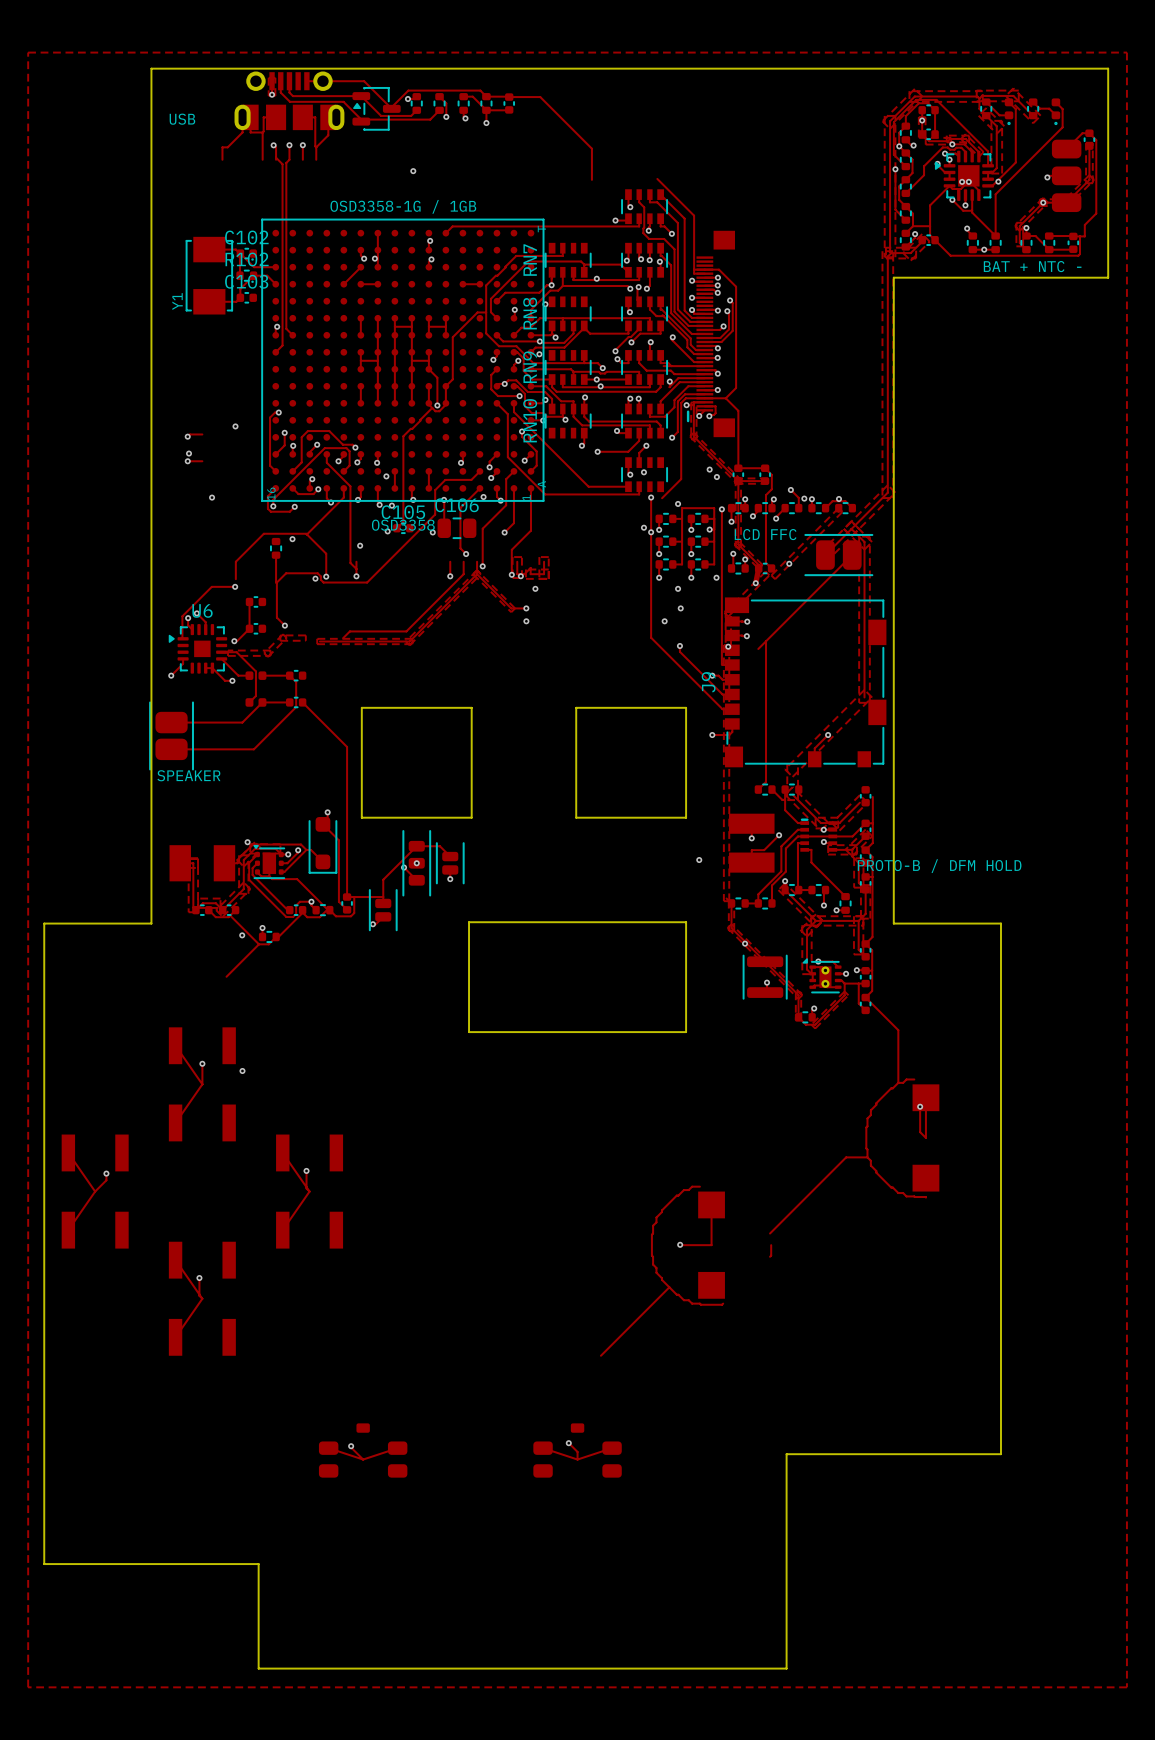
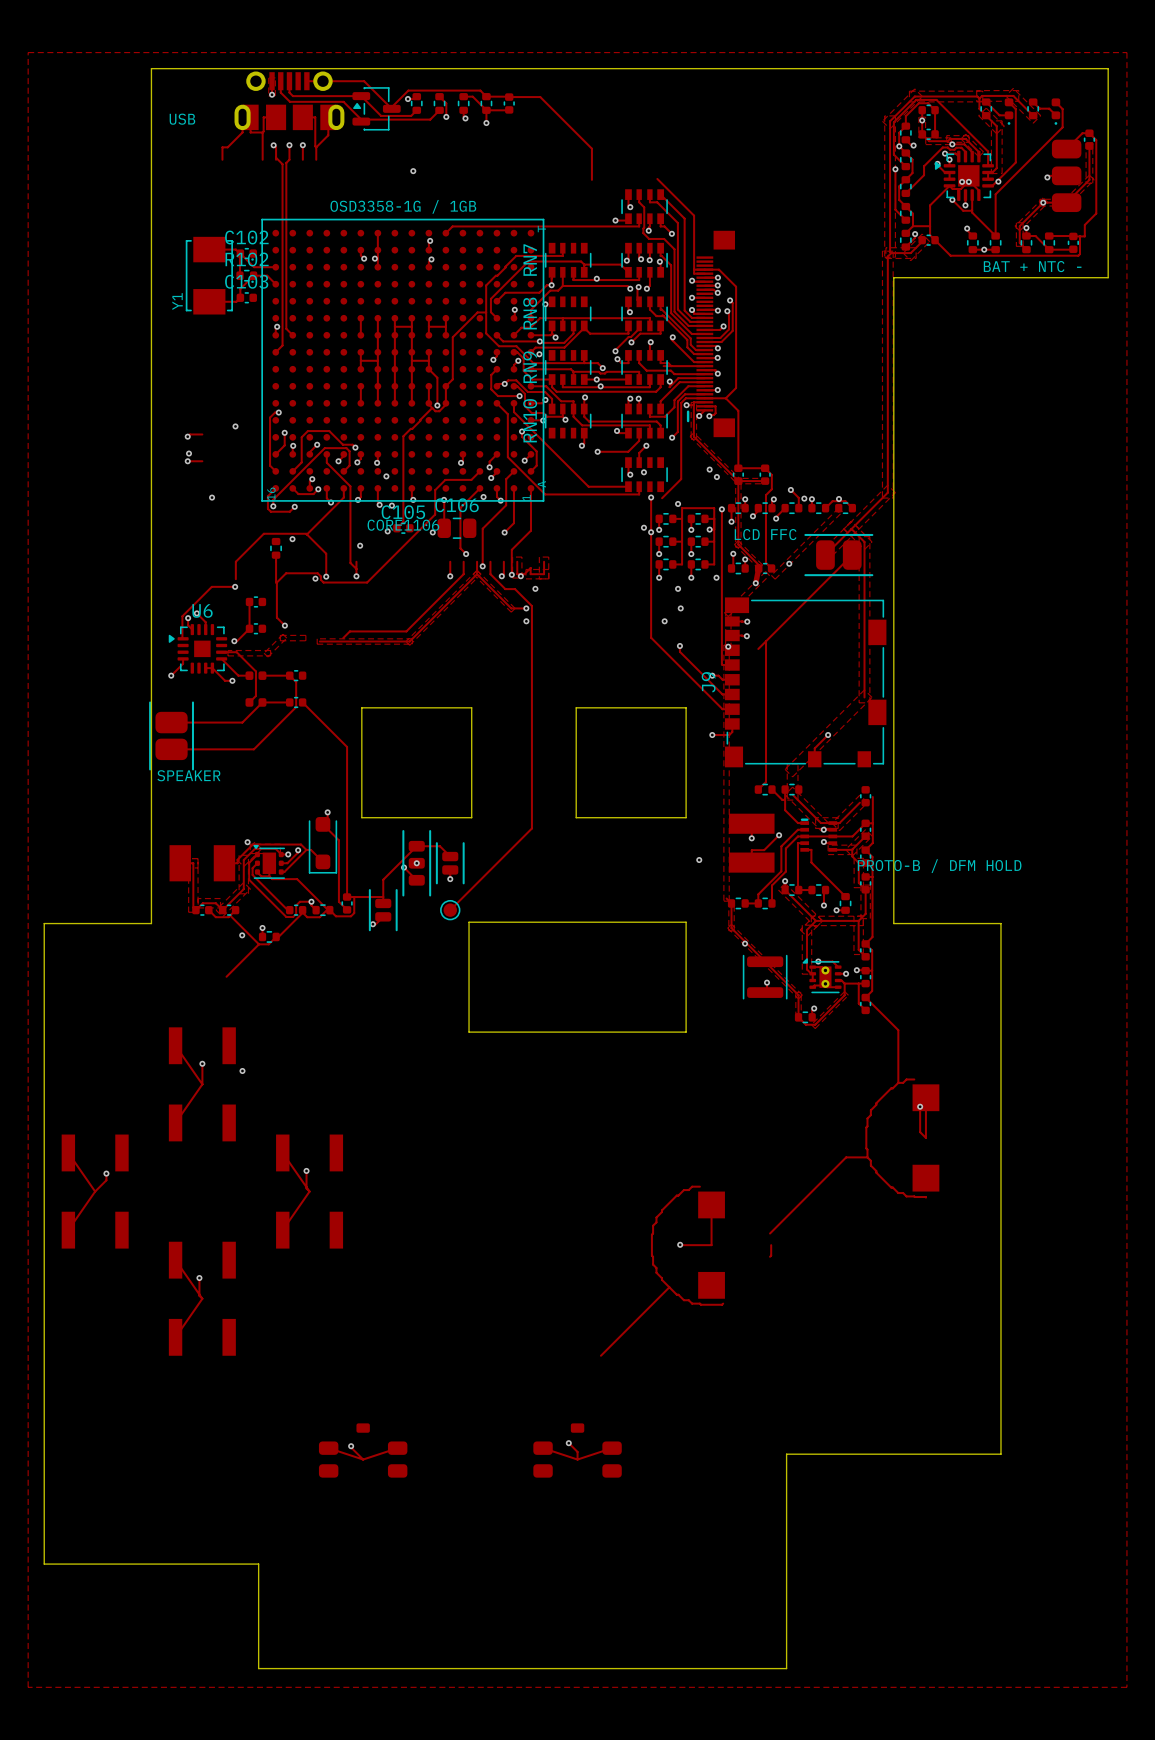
track: (360, 267) (343, 284) -> none
track: (360, 284) (377, 284) -> none
track: (462, 284) (479, 284) -> none
track: (394, 471) (394, 488) -> none
track: (428, 471) (428, 488) -> none
text: OSD3358 (403, 525) -> CORE1106 (403, 525)
track: none -> (490, 561) (490, 574) (505, 589) (515, 589) (531, 606) (531, 828) (450, 910)
track: none -> (503, 561) (503, 574) (501, 576)
via: none -> (501, 576)
part: none -> (450, 910)

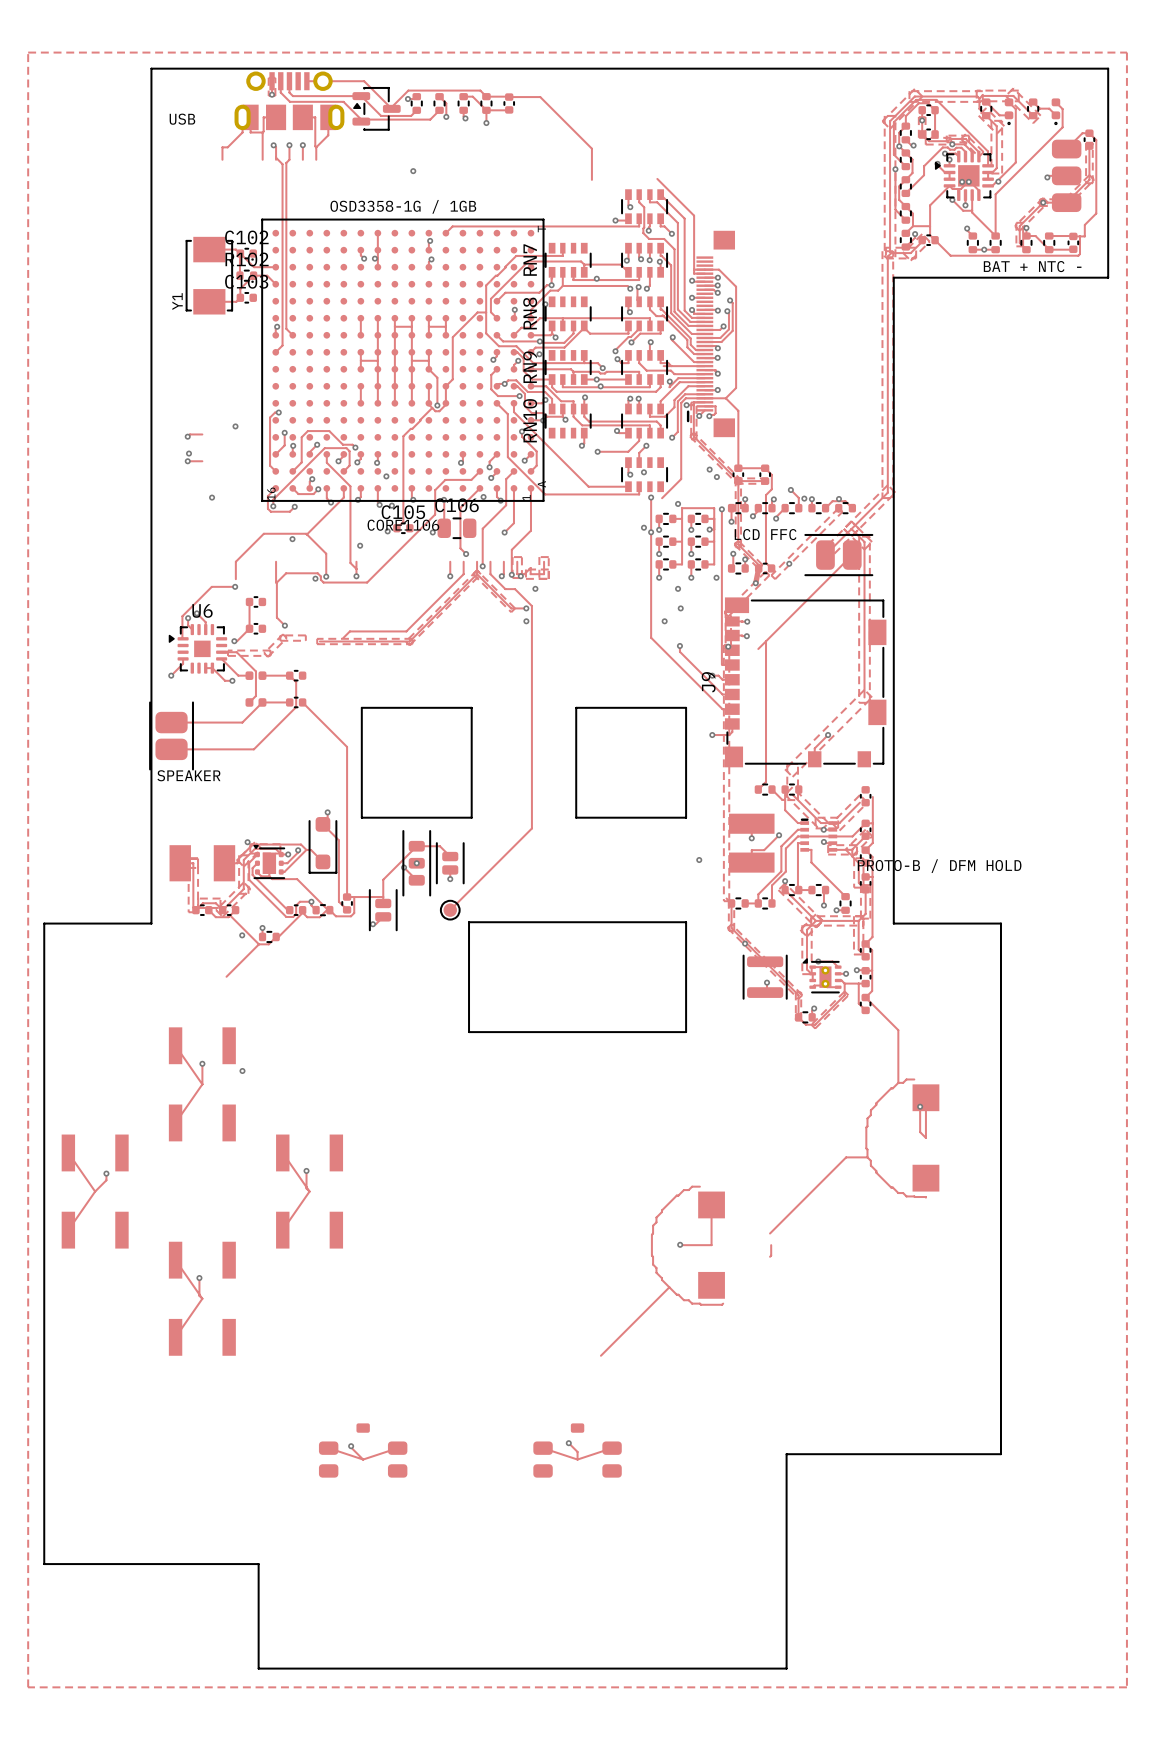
part: (276, 548) -> none

